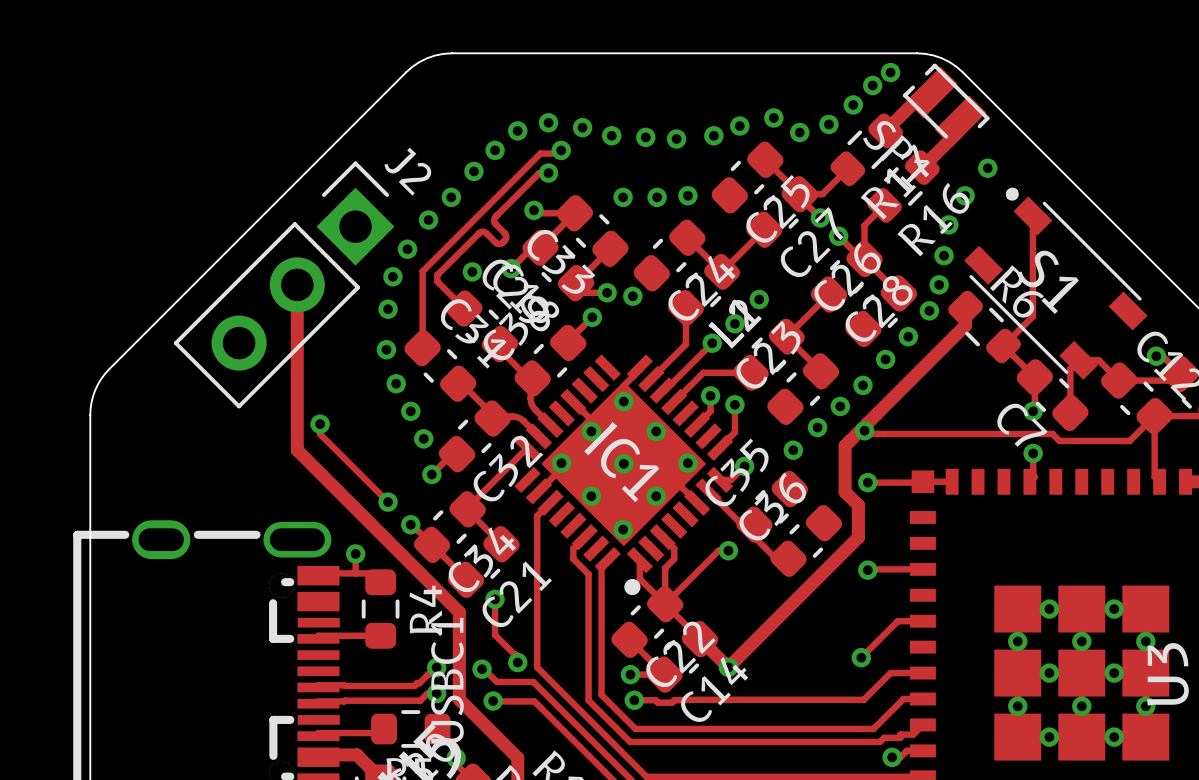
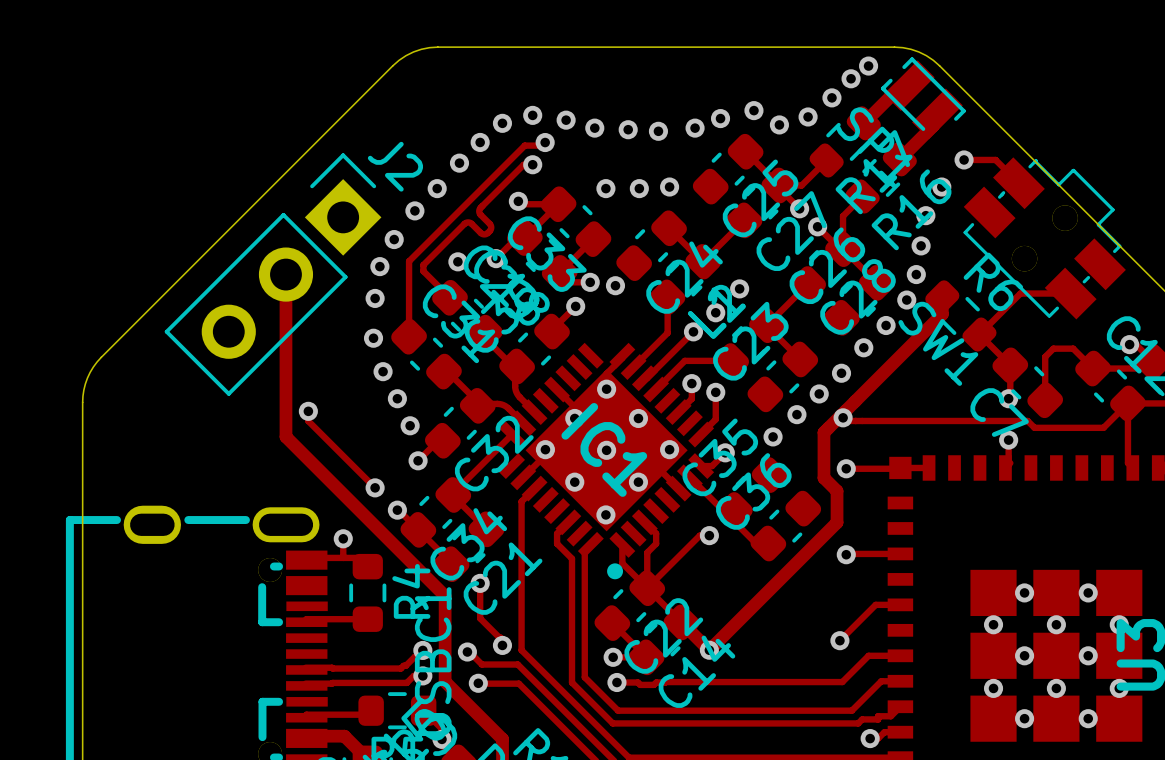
track: none -> (964, 159) (995, 159) (1018, 183)
track: (1032, 215) (1032, 316) -> (1070, 293) (1020, 293) (1008, 305)
SW1: none -> (1044, 238)
S1: (1055, 283) -> none

